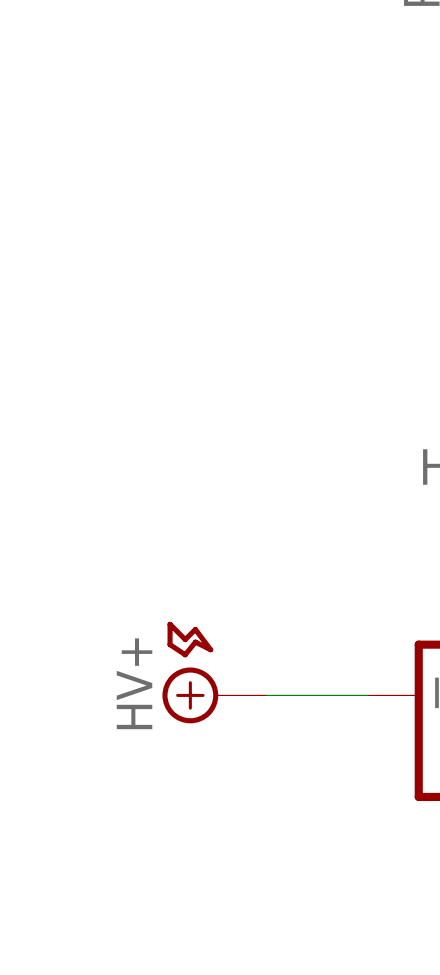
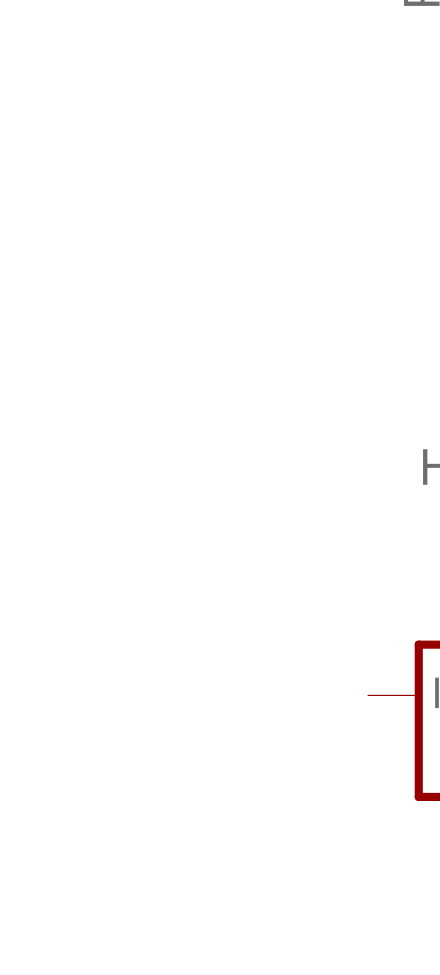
power symbol: HV+ (214, 672) -> none
wire: (266, 695) (368, 695) -> none

